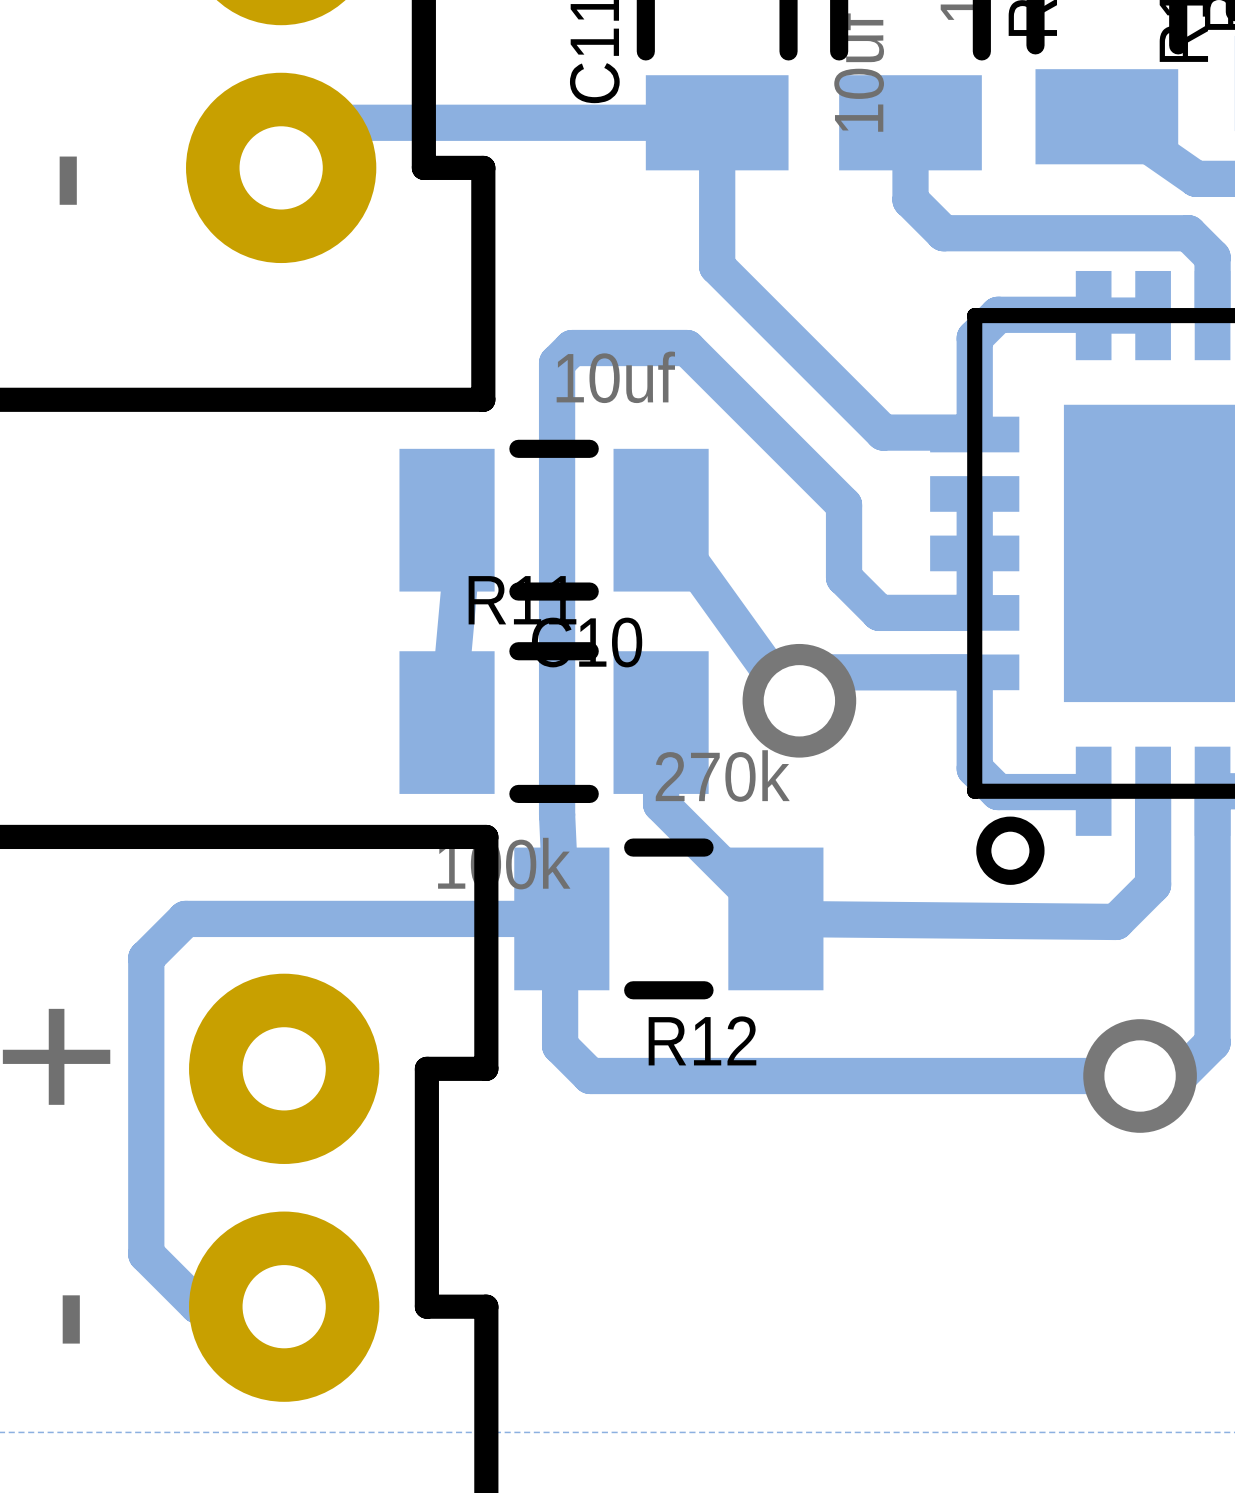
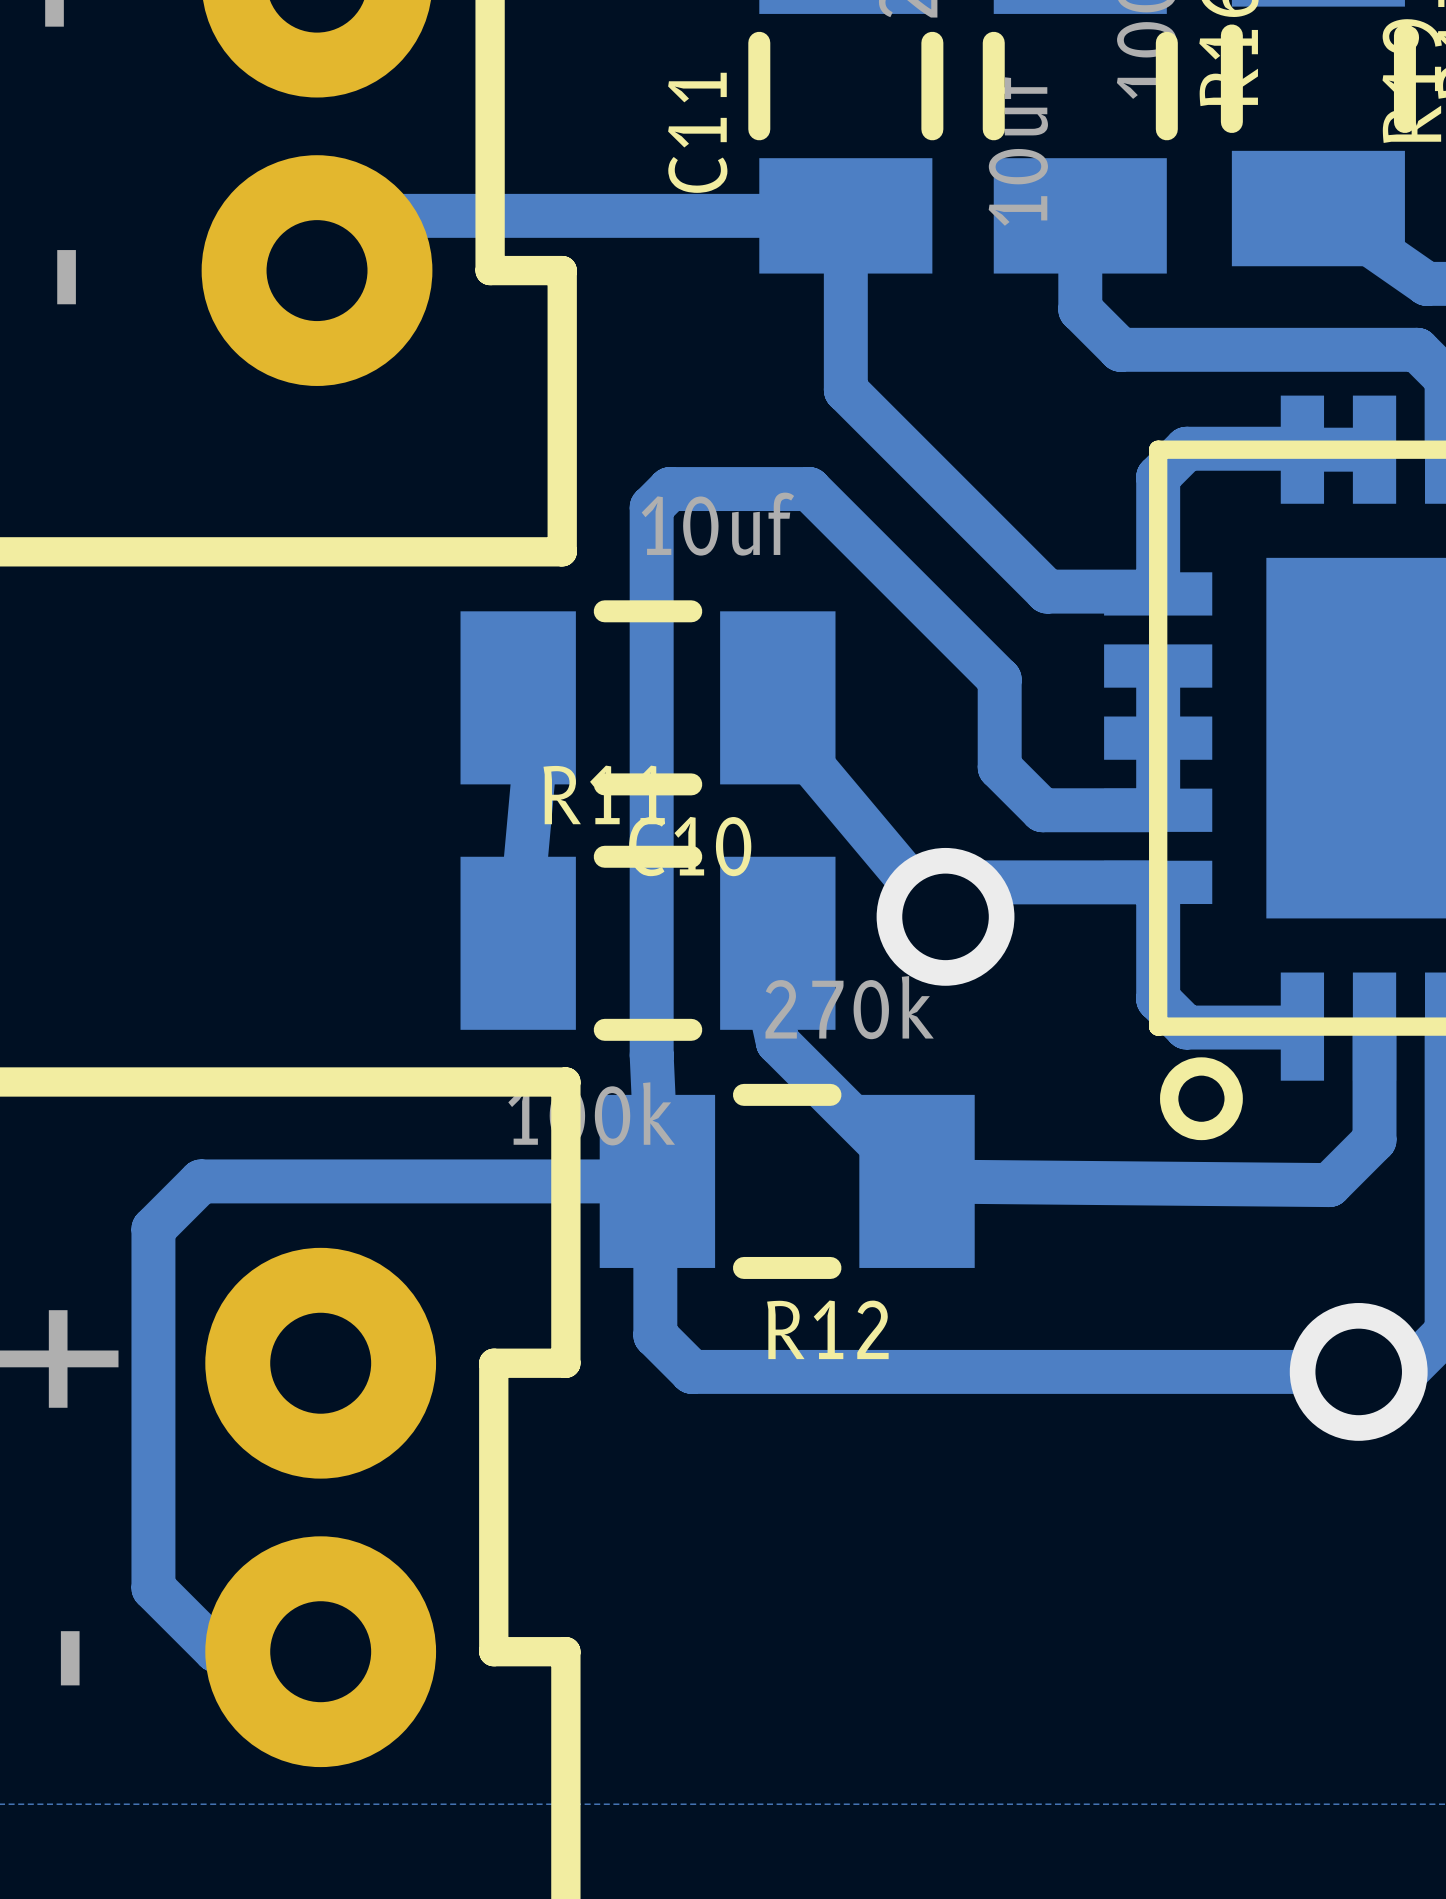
track: (661, 520) (769, 670) -> (755, 697) (908, 880)

